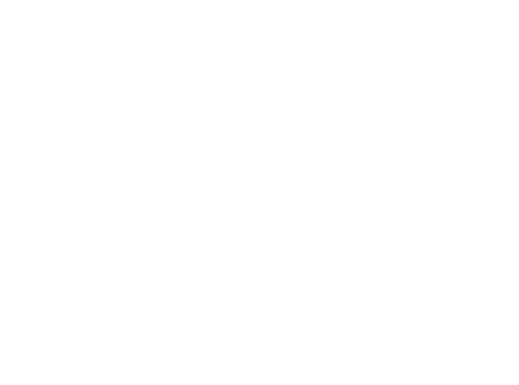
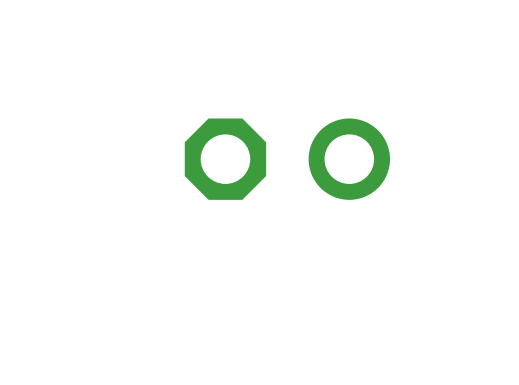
part: none -> (287, 159)

